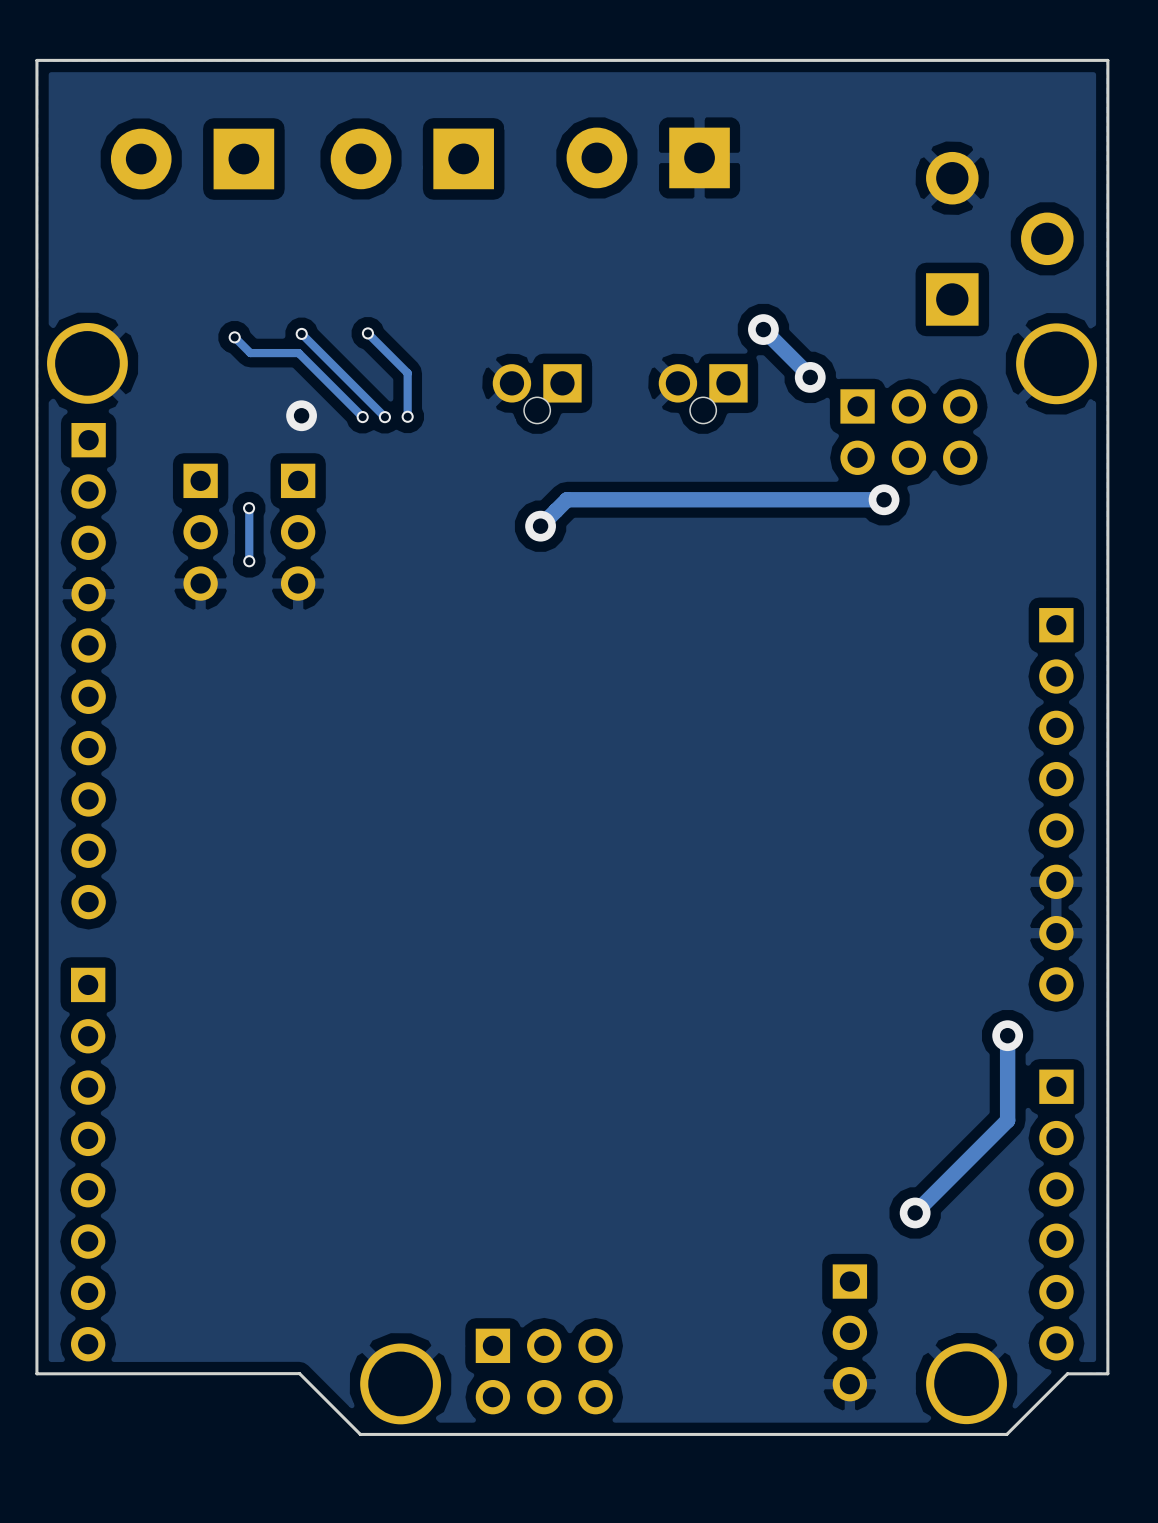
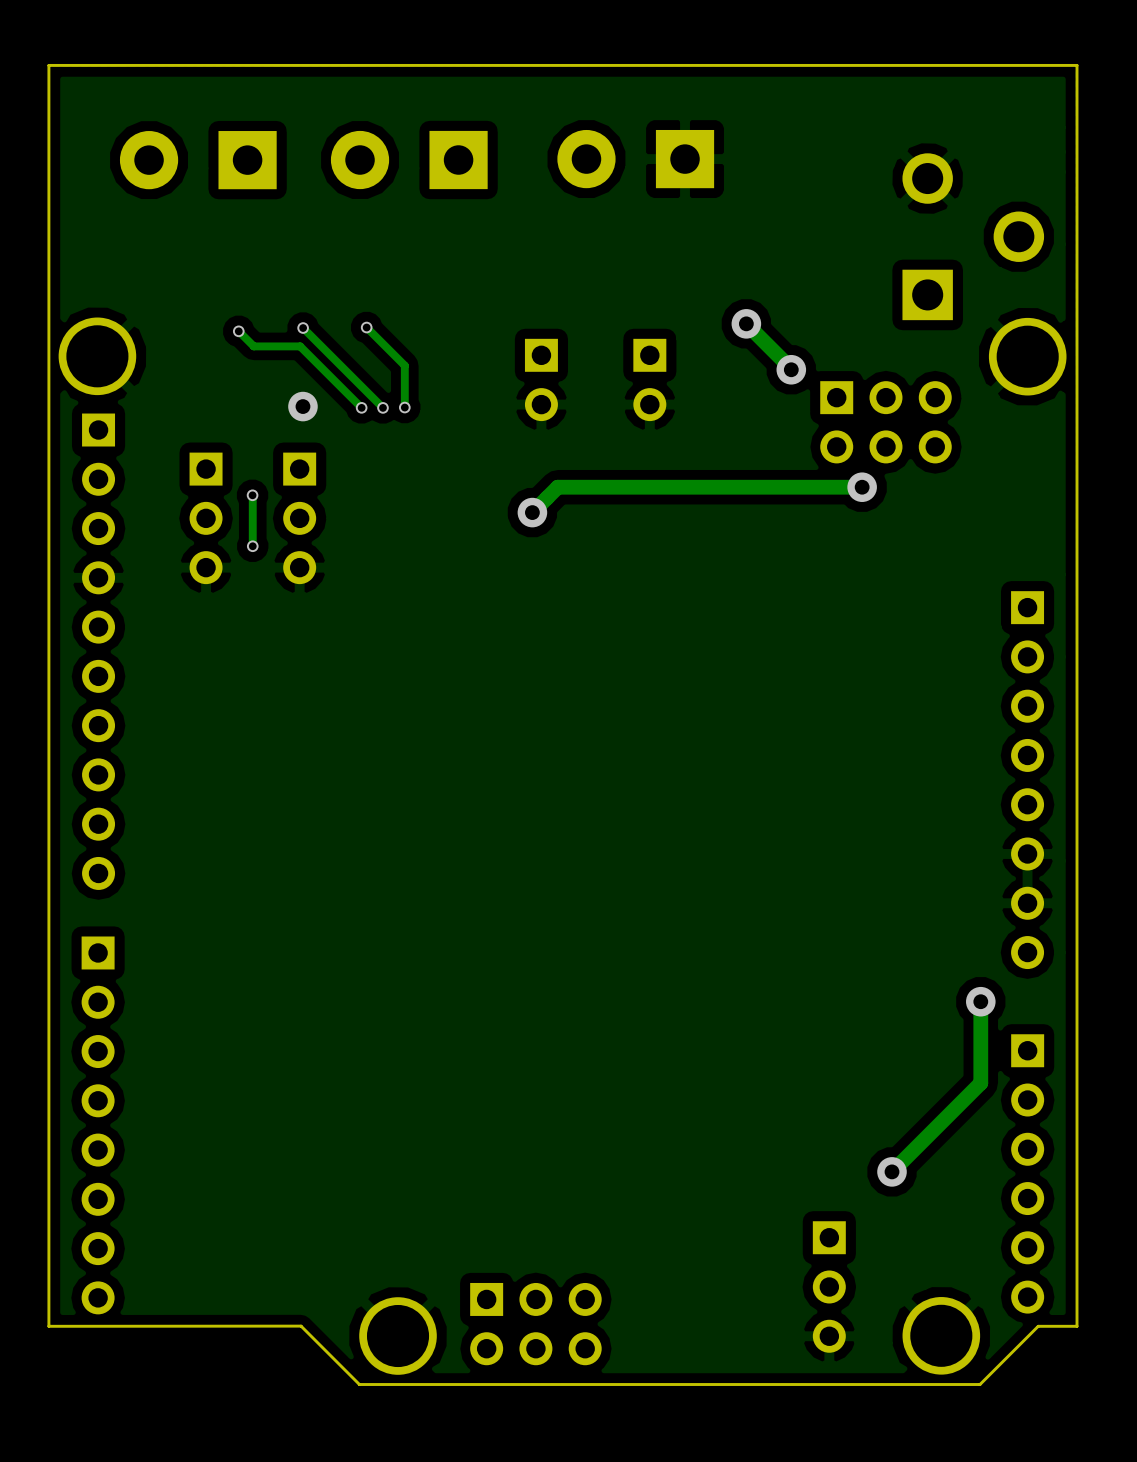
part footprint: [492, 364, 582, 424] -> [524, 338, 558, 422]
part: none -> (649, 379)
part: (703, 393) -> none

